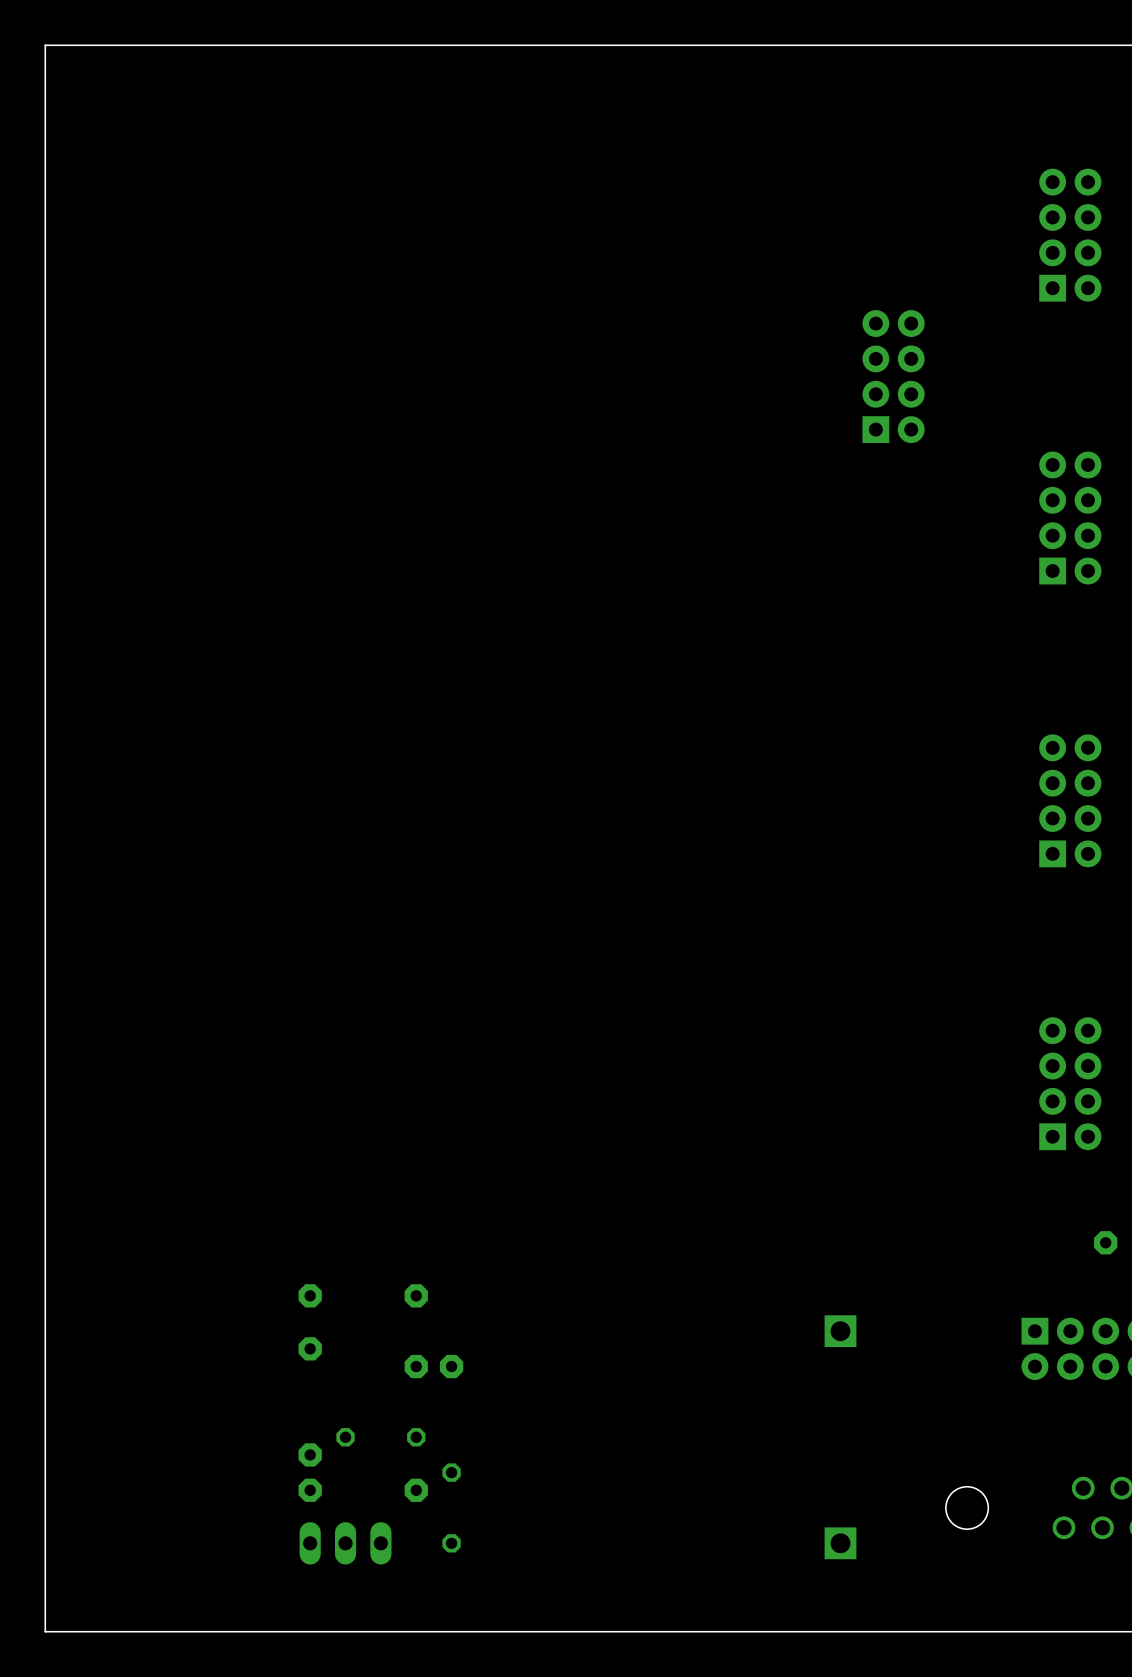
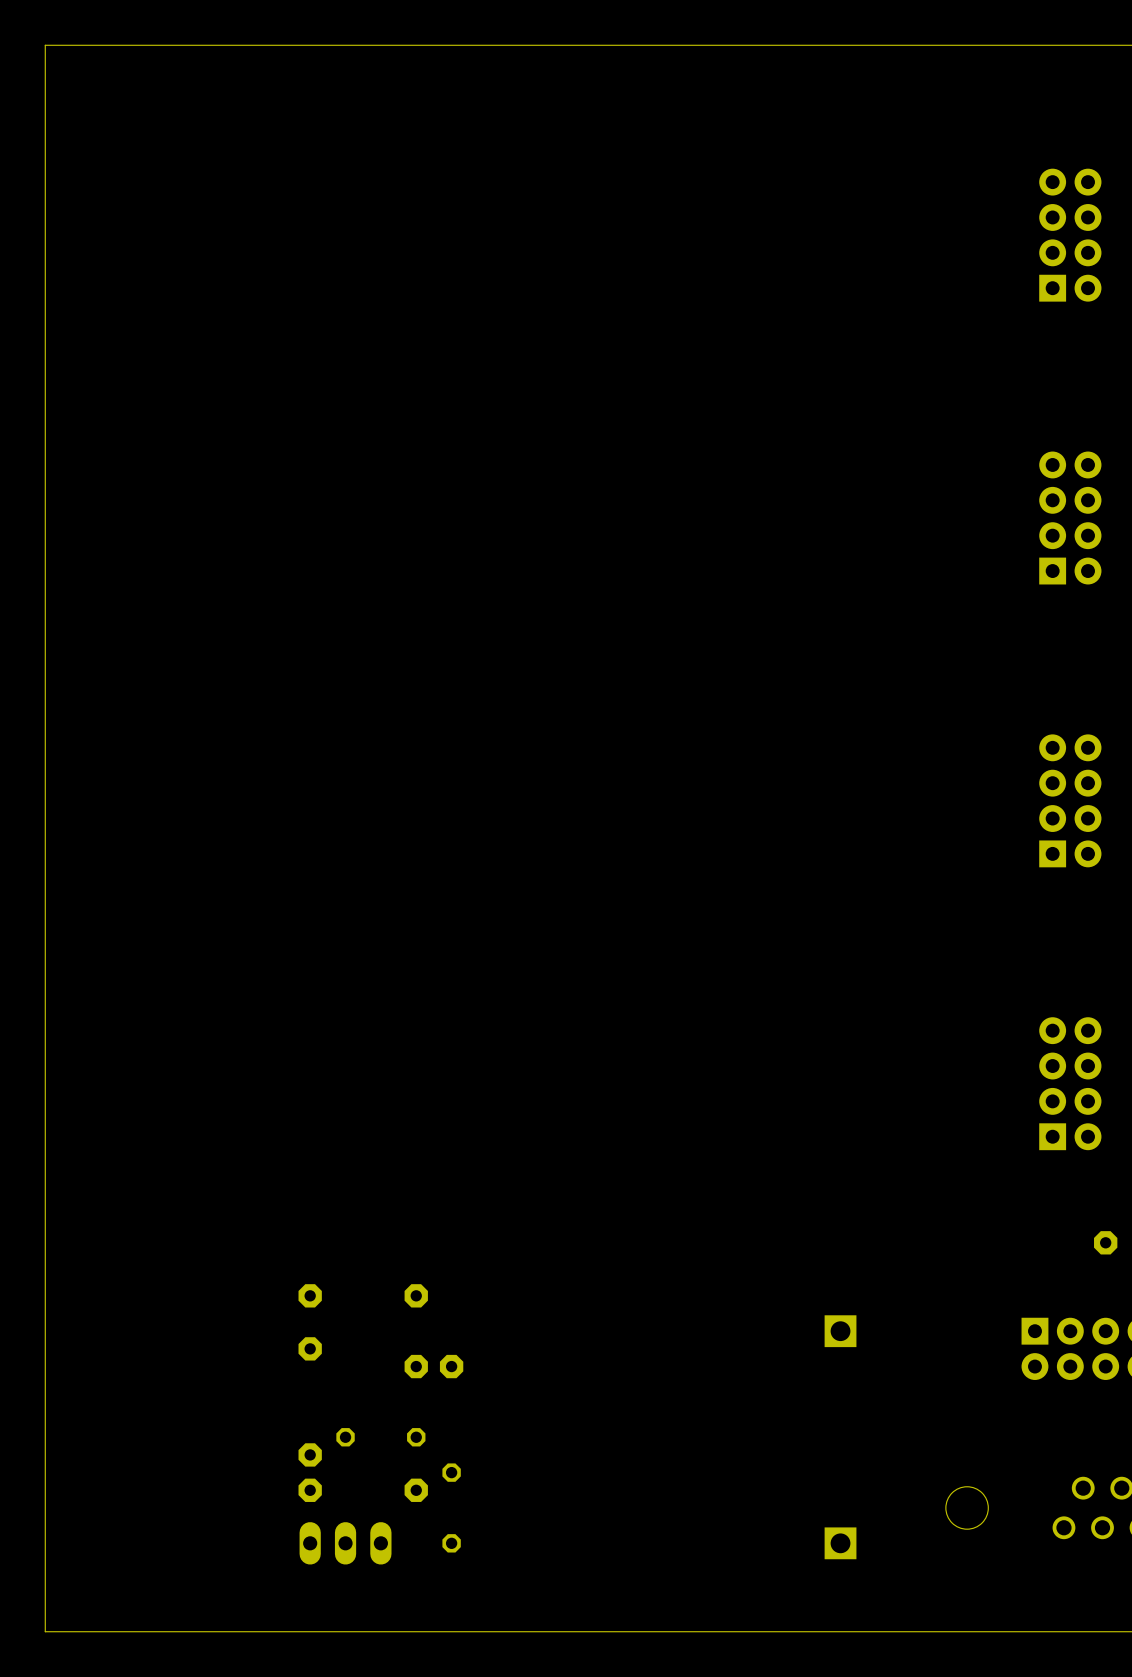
part: (893, 376) -> none

